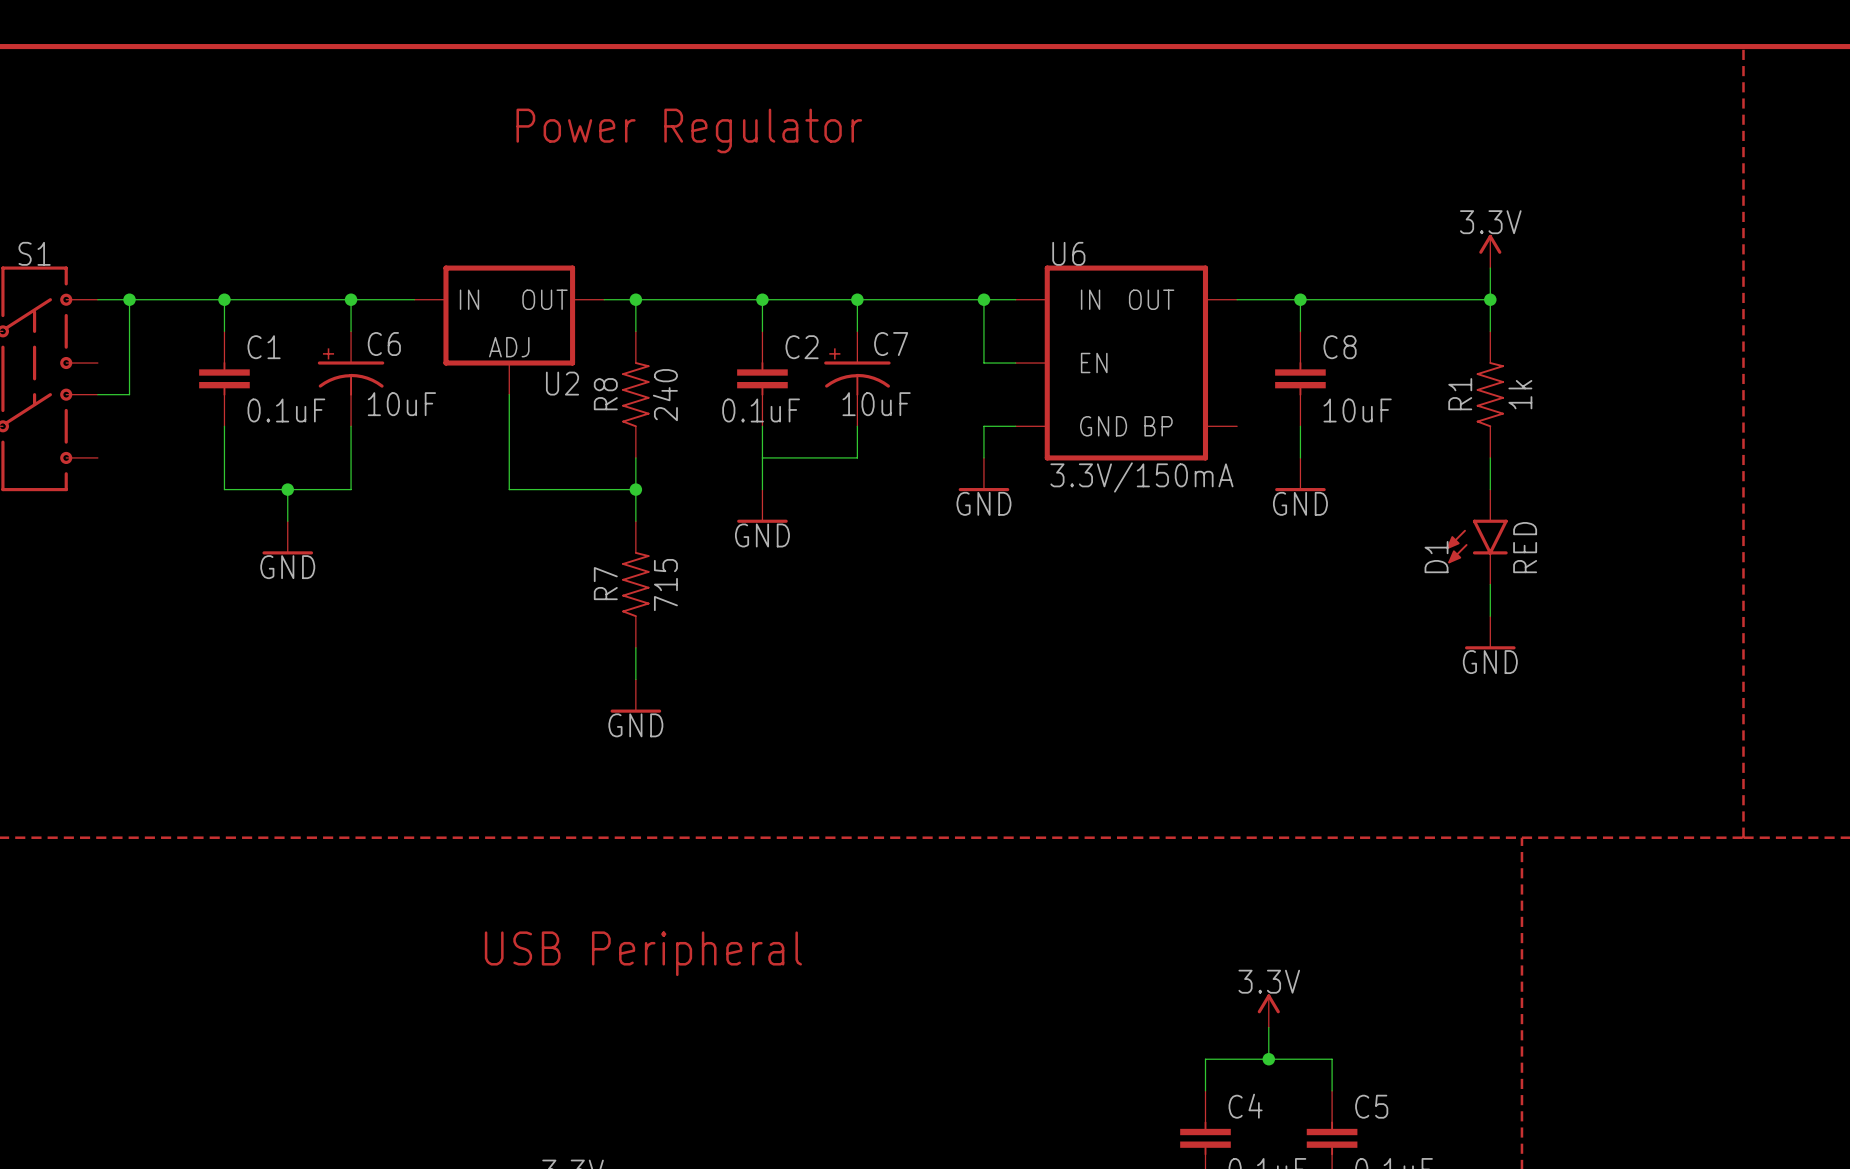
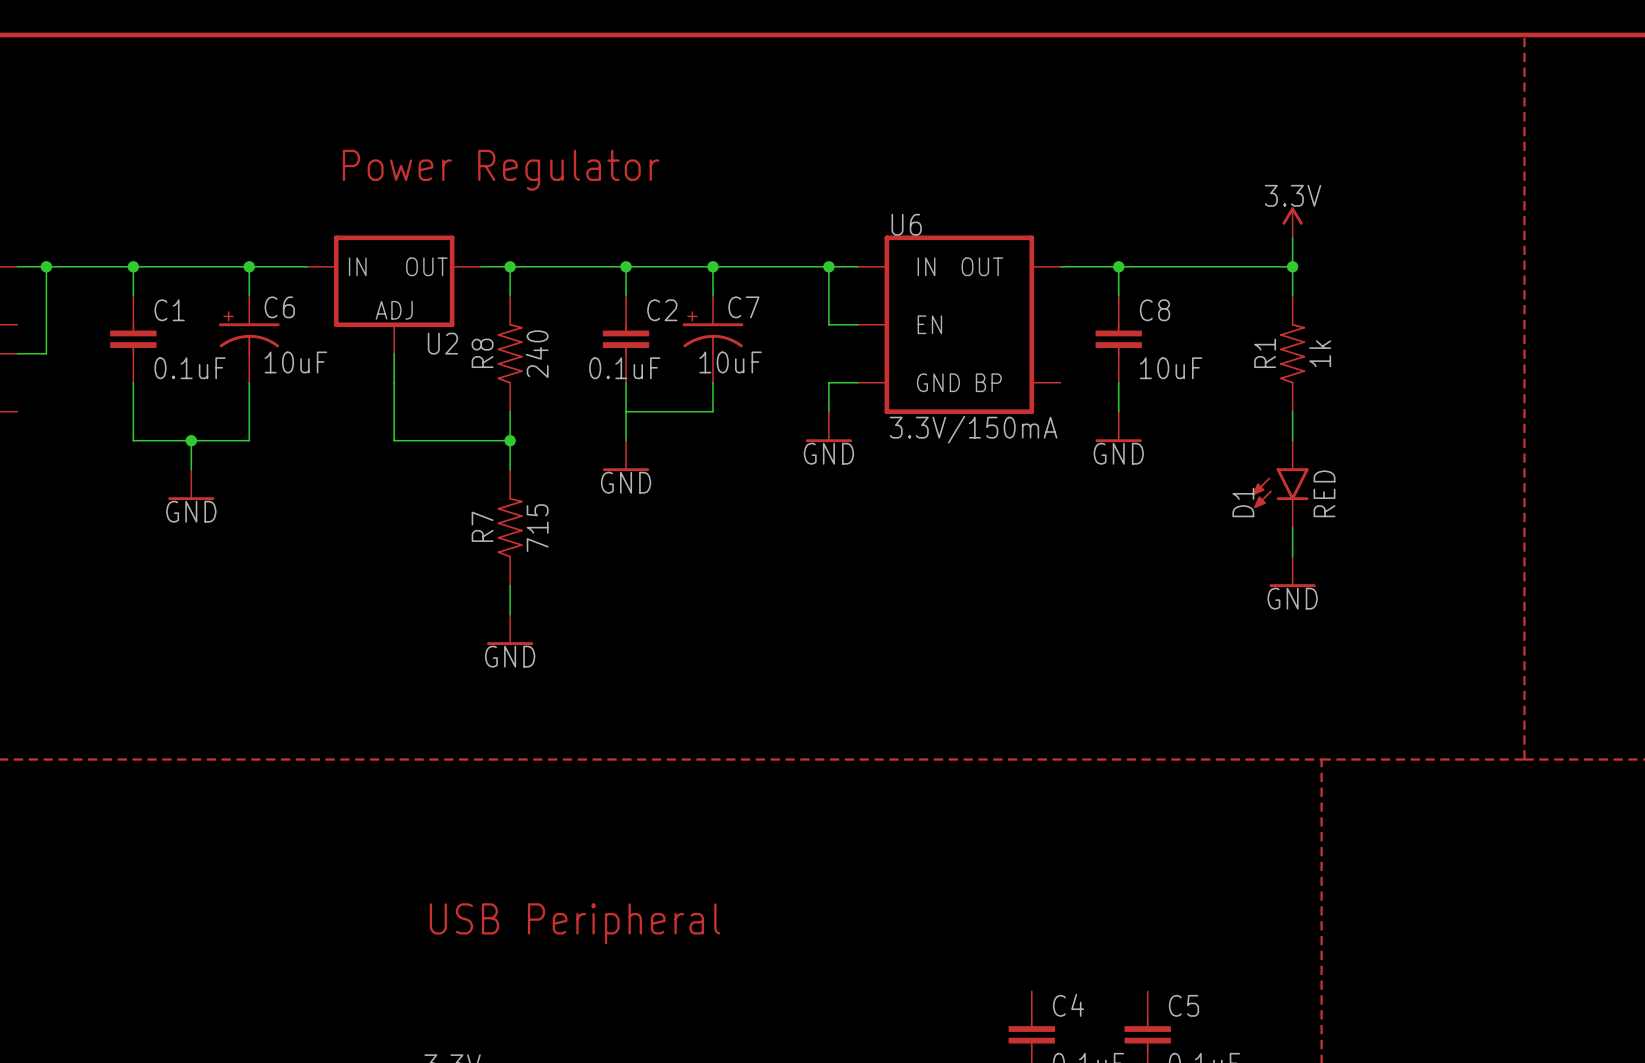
text position: Power Regulator (689, 130) -> Power Regulator (501, 170)
text position: USB Peripheral (643, 953) -> USB Peripheral (574, 923)
power symbol: 3.3V (1268, 1010) -> none
wire: (1268, 1027) (1268, 1059) -> none
junction: (1268, 1059) -> none
wire: (1205, 1090) (1205, 1059) (1332, 1059) (1332, 1090) -> none

